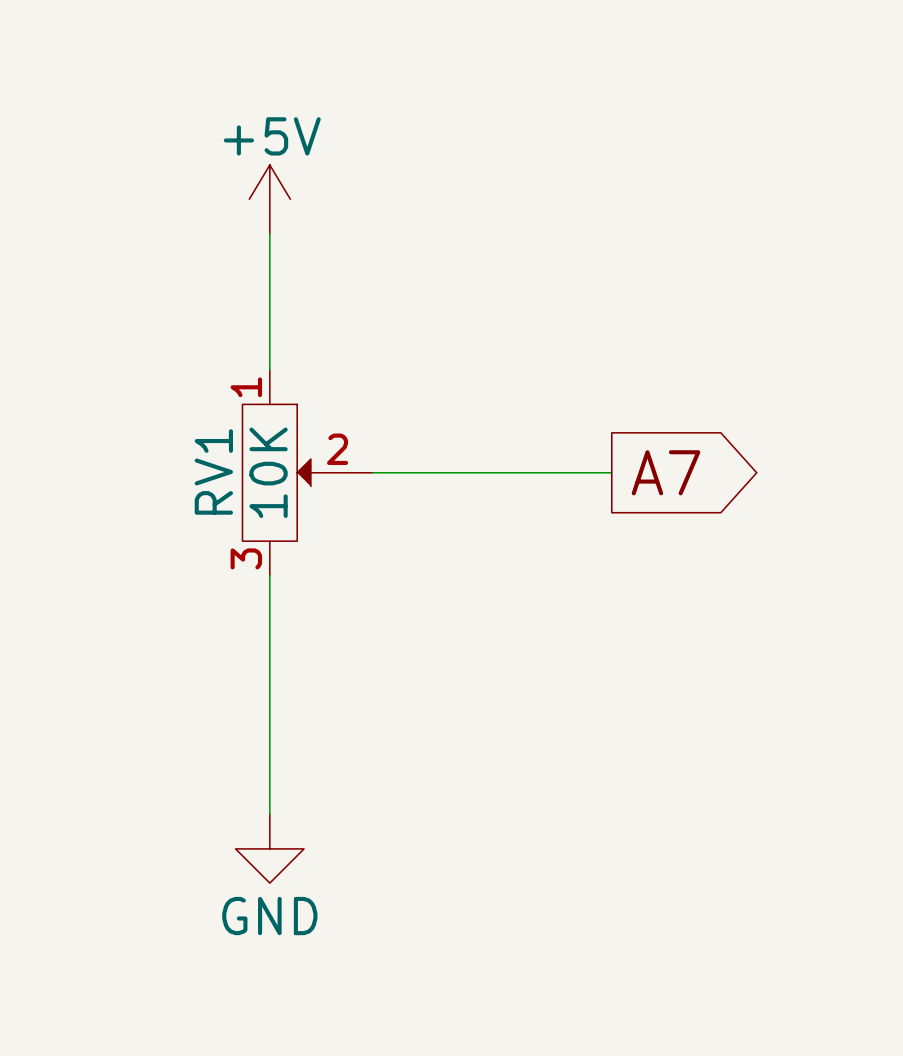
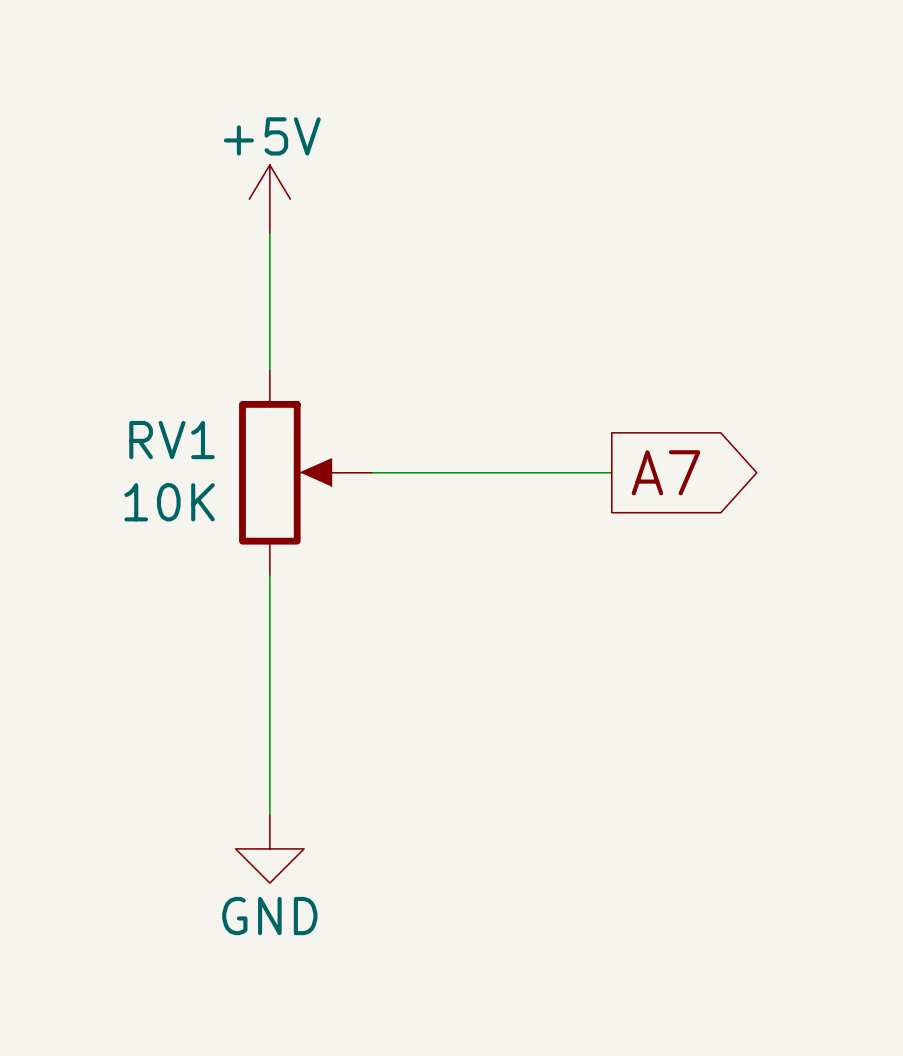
RV1 symbol: [242, 370, 373, 576] -> [239, 370, 373, 576]
RV1 name position: RV1 (213, 471) -> RV1 (172, 440)
RV1 value position: 10K (268, 472) -> 10K (169, 502)

